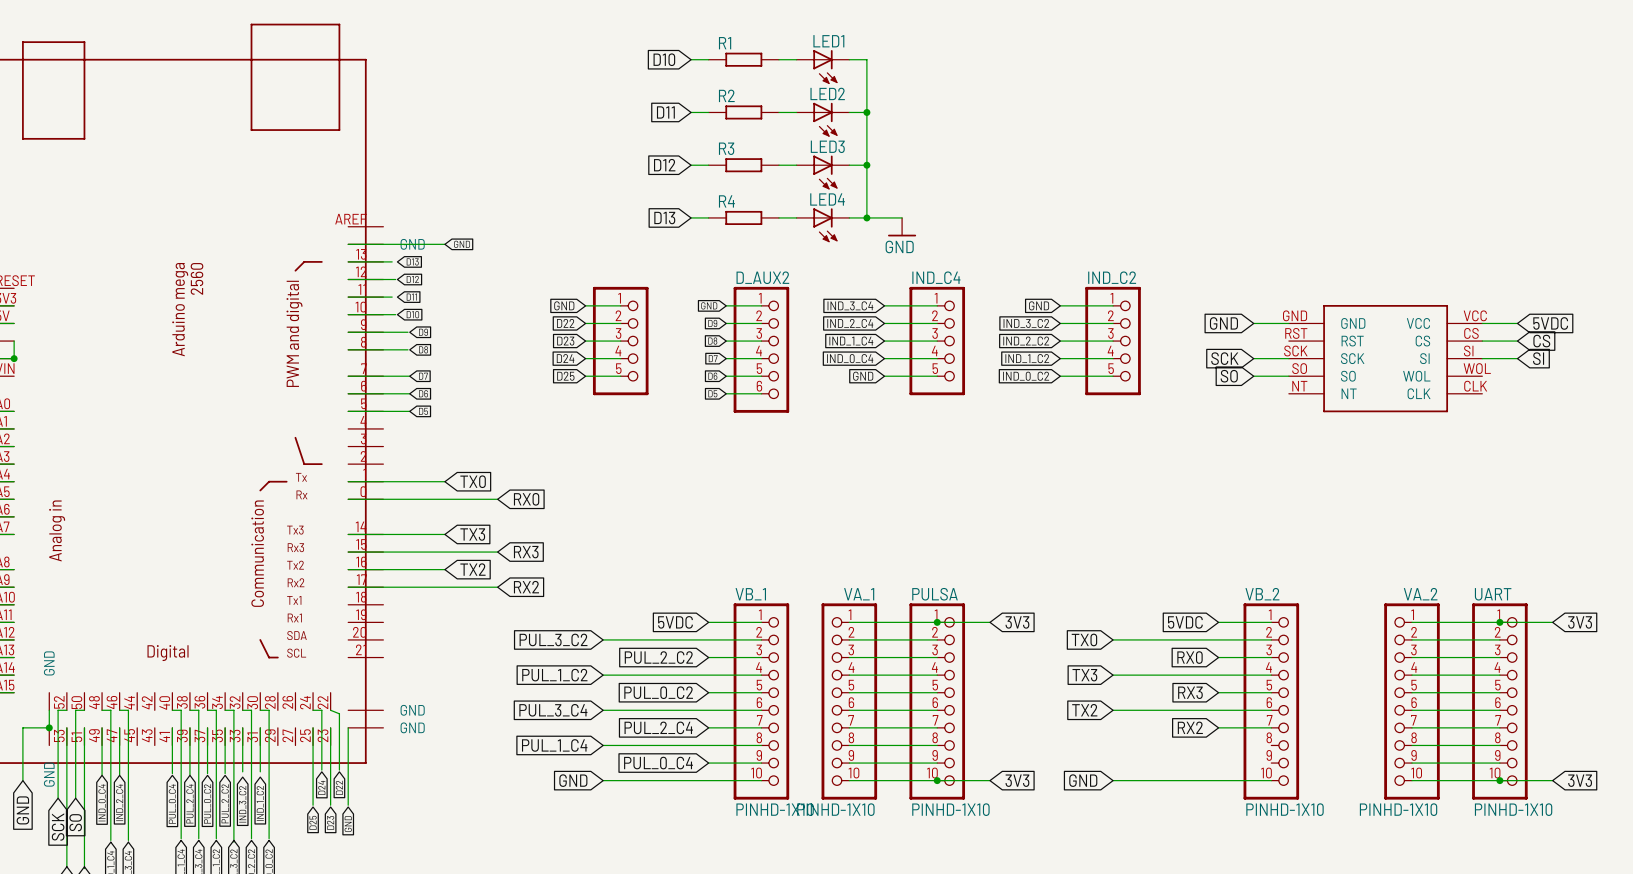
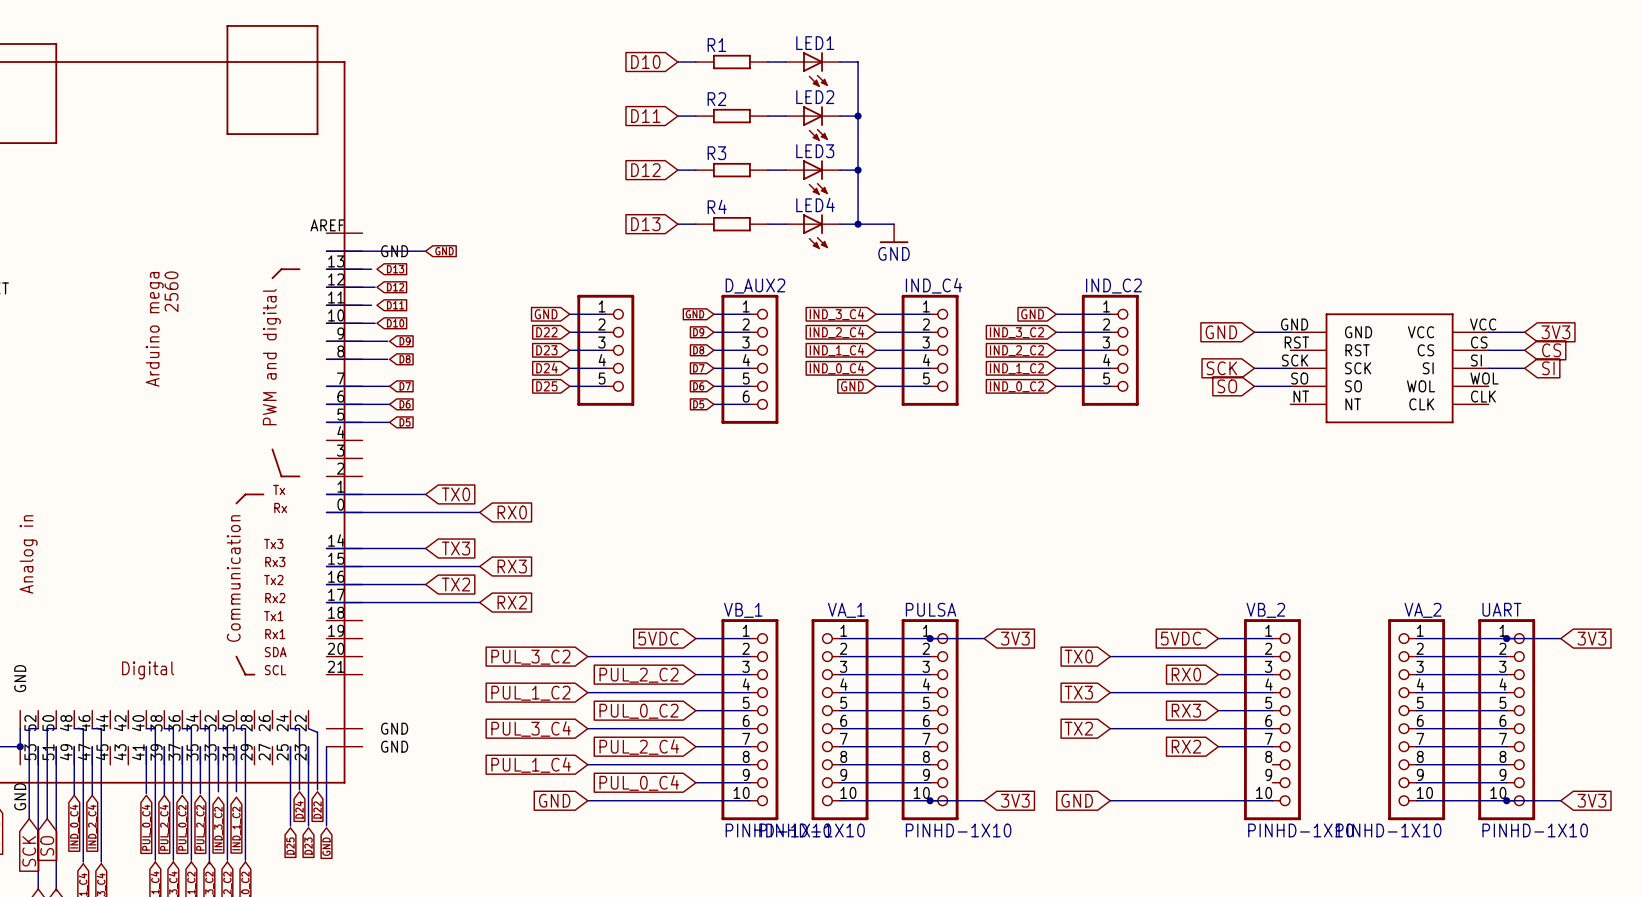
global label: 5VDC (1550, 323) -> 3V3 (1555, 332)

